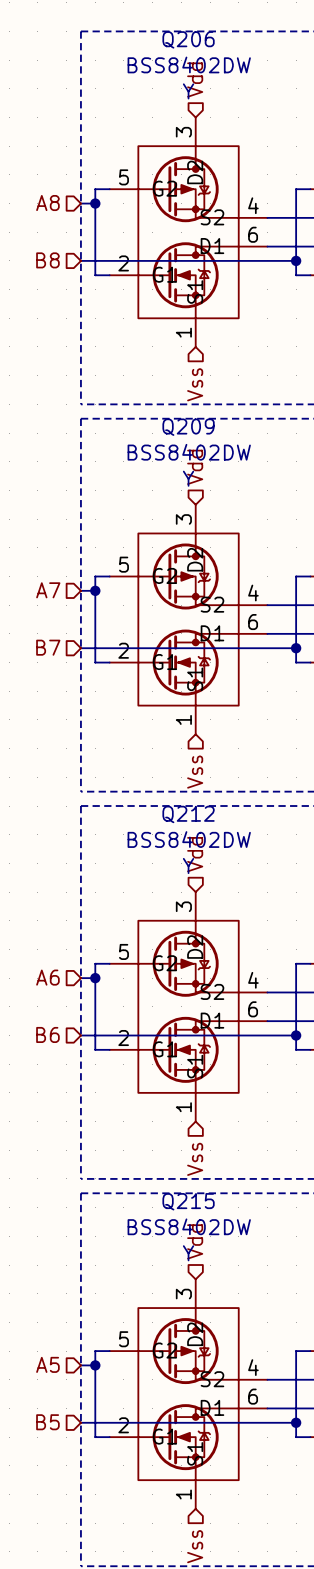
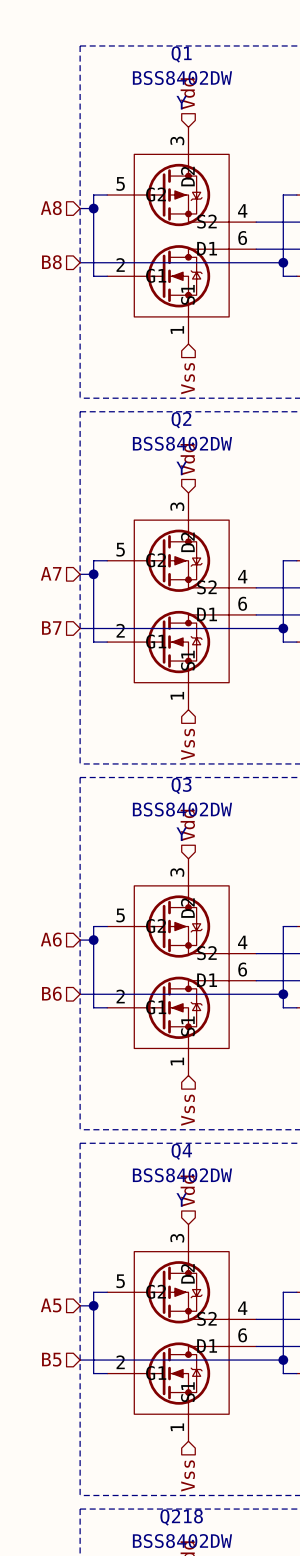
Q206 name: Q206 (188, 39) -> Q1 (181, 54)
Q209 name: Q209 (188, 427) -> Q2 (181, 420)
Q212 name: Q212 (188, 814) -> Q3 (181, 785)
Q215 name: Q215 (188, 1201) -> Q4 (181, 1151)

